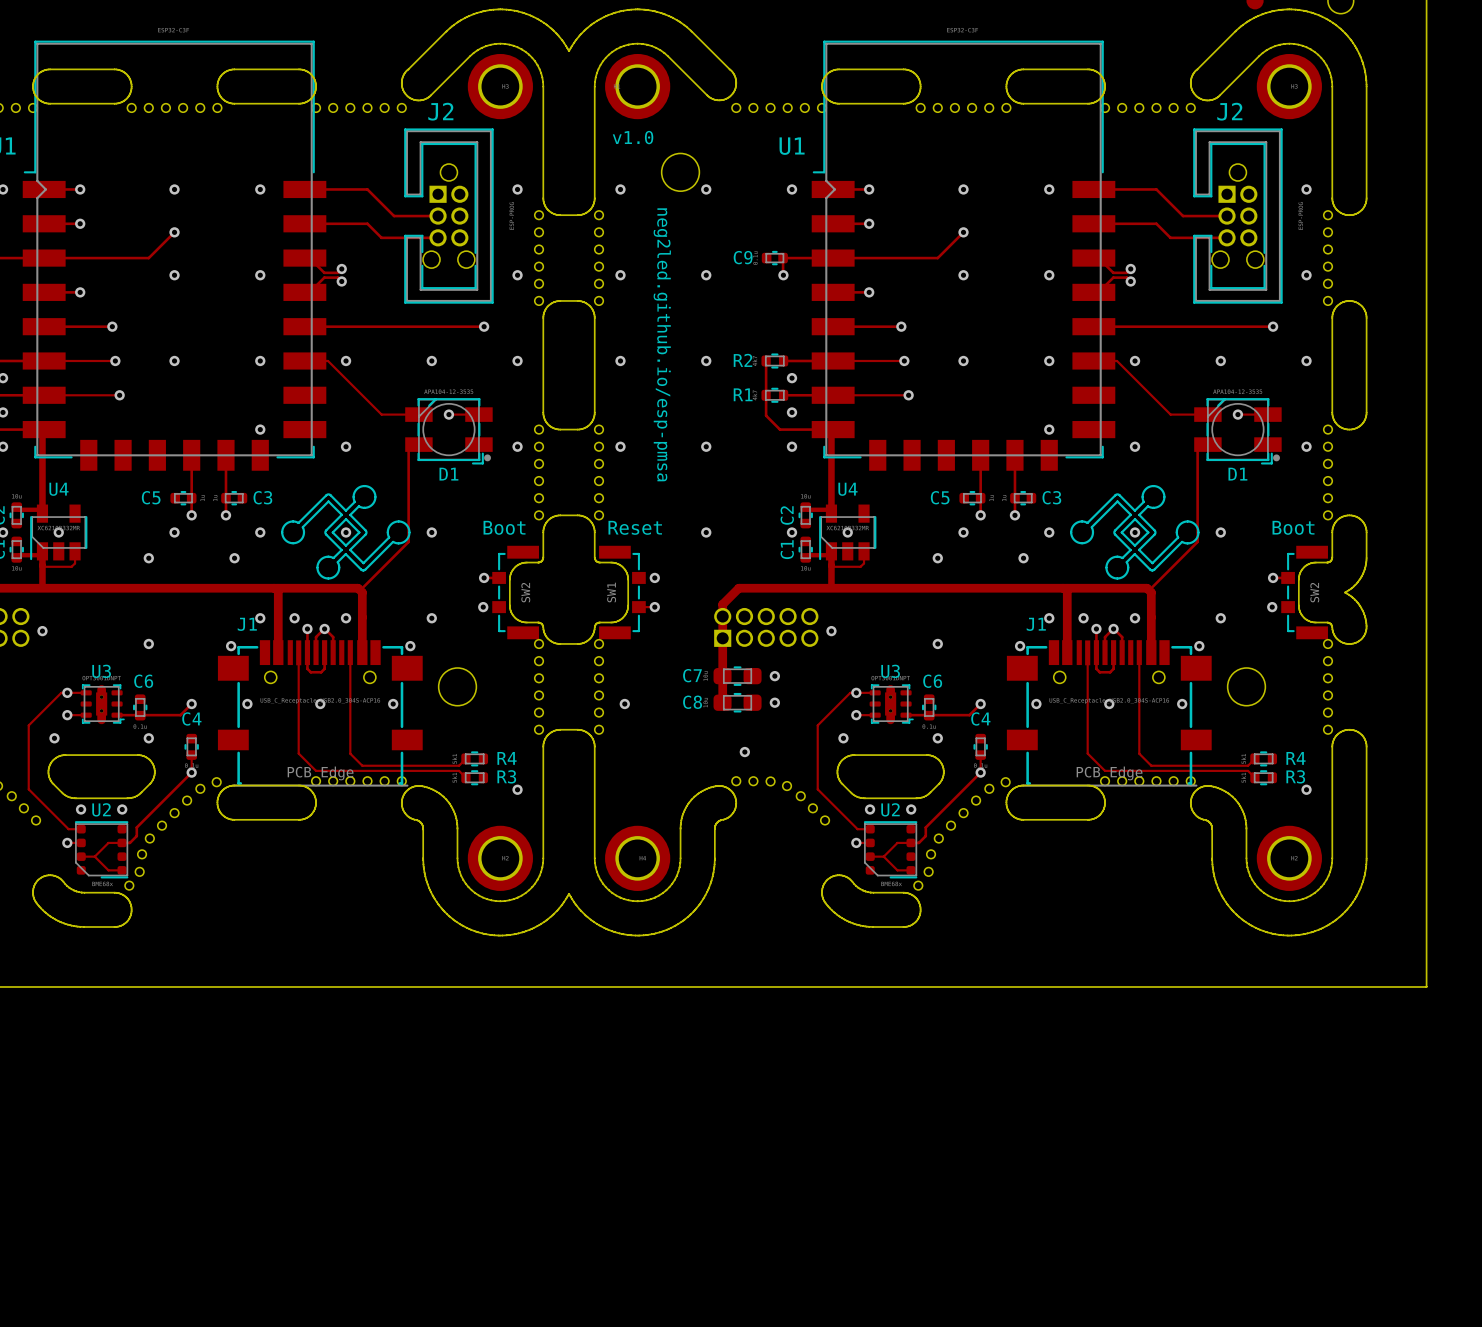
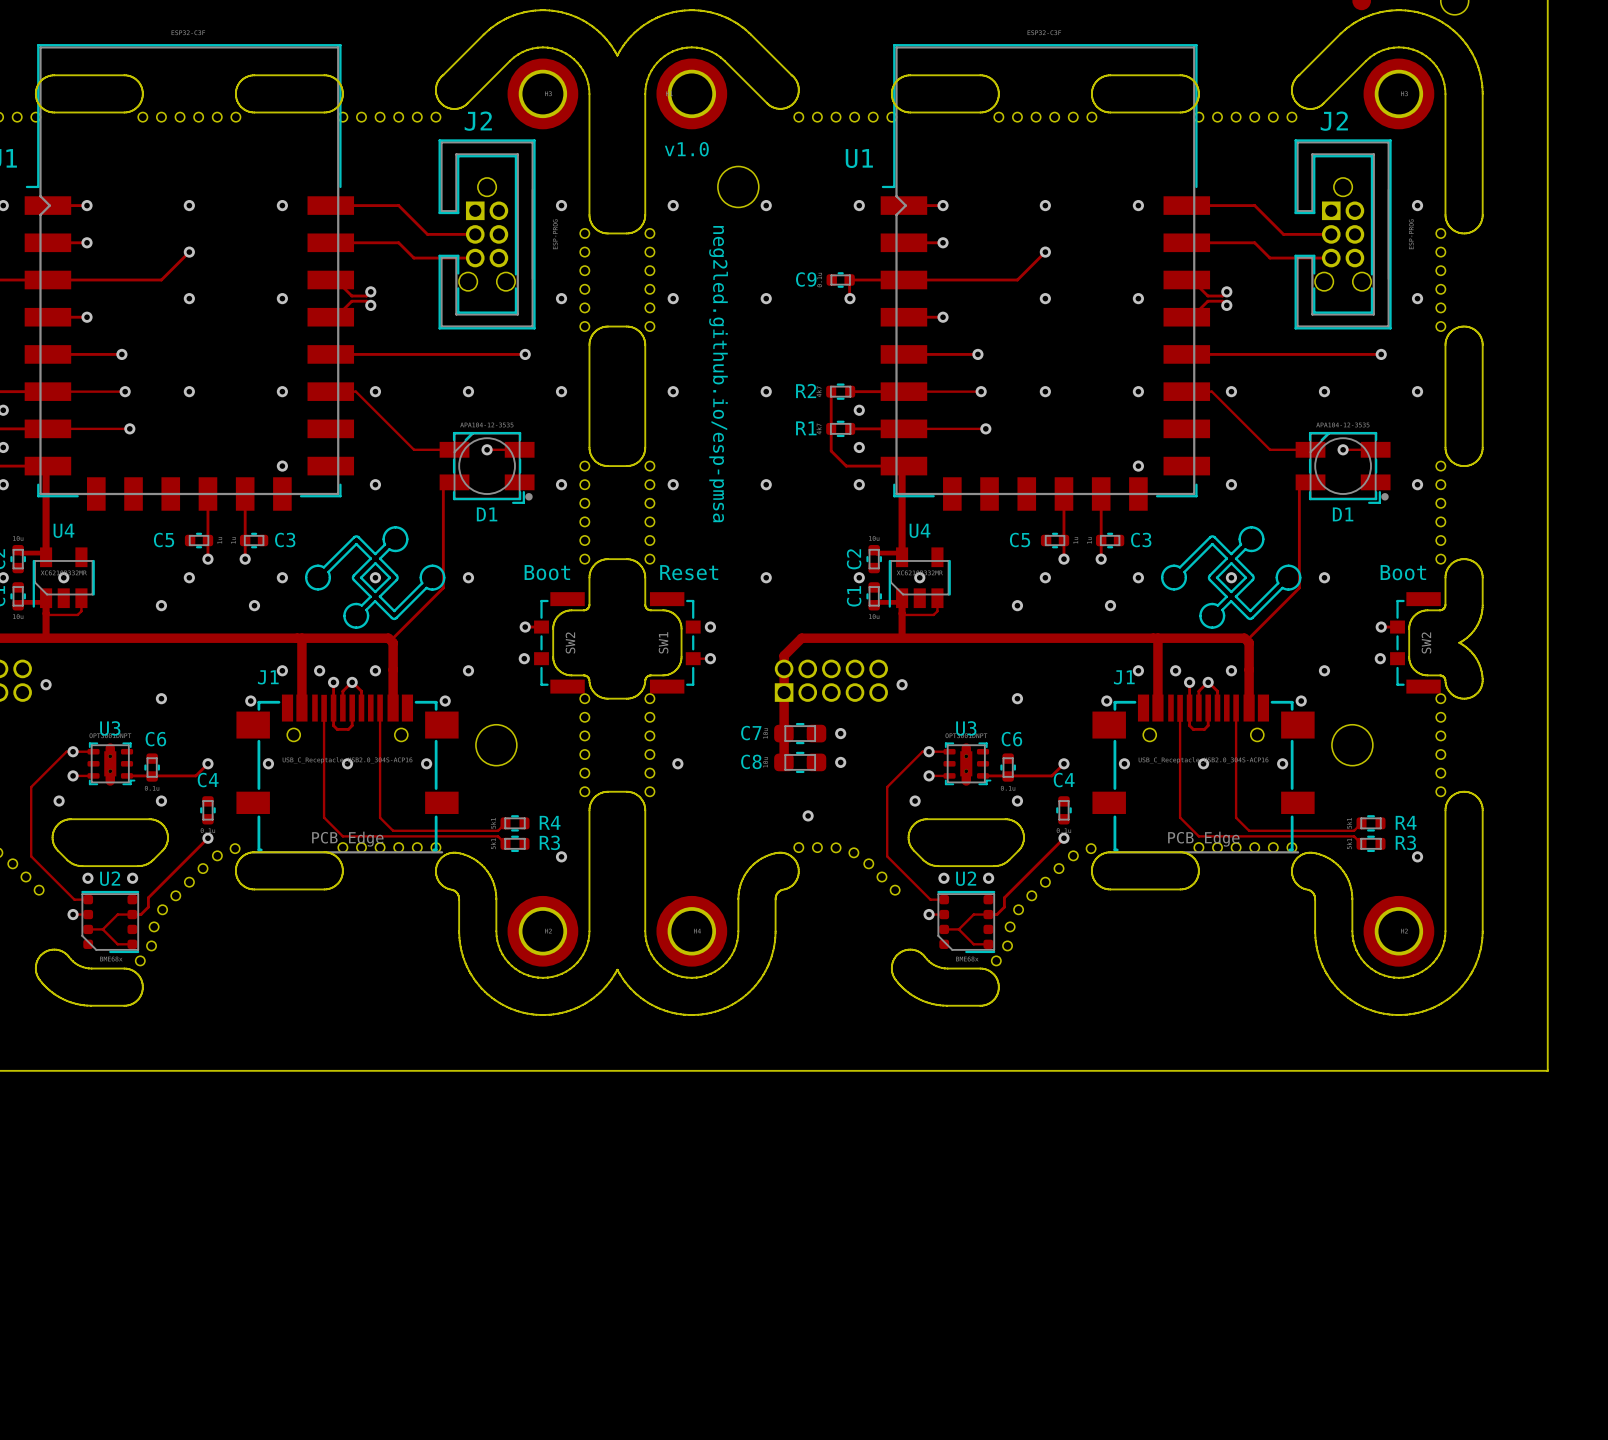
track: (191, 755) (191, 772) -> none
track: (980, 755) (980, 772) -> none

